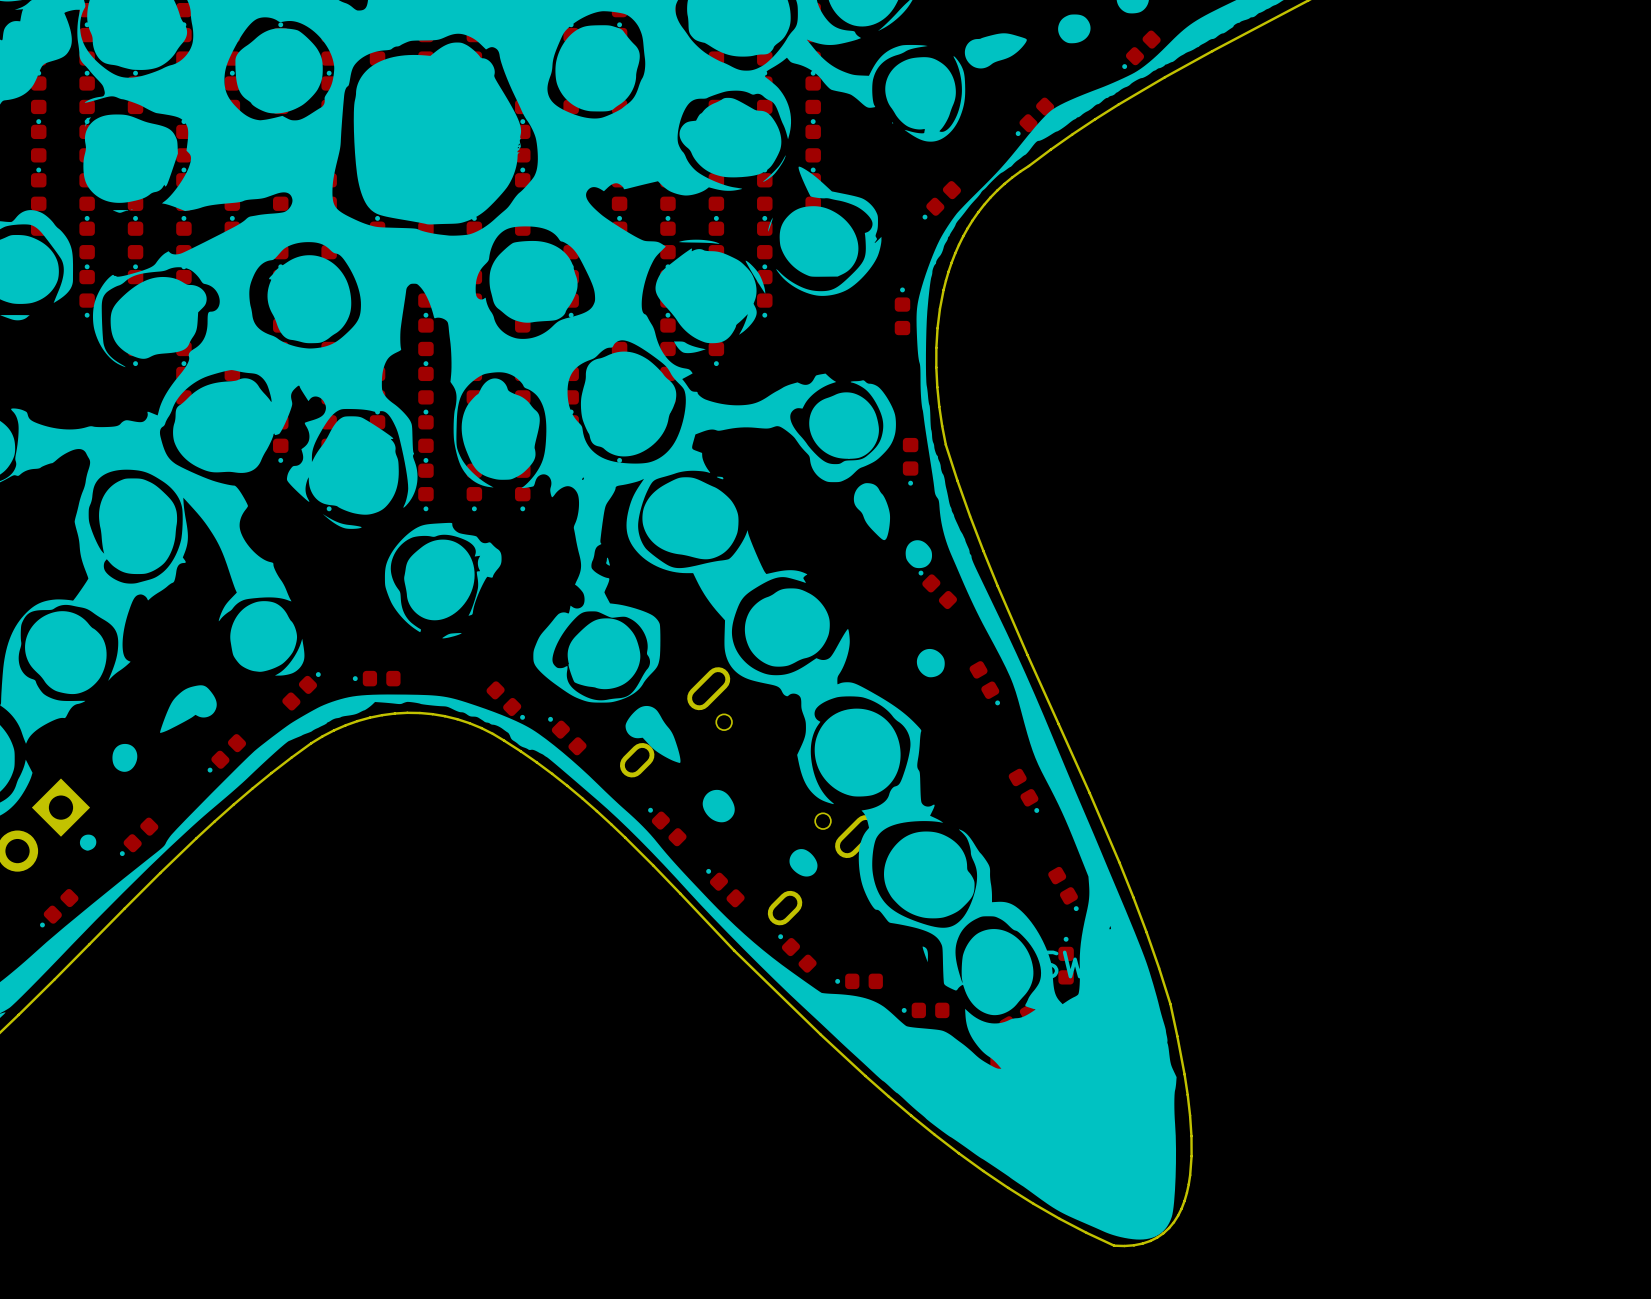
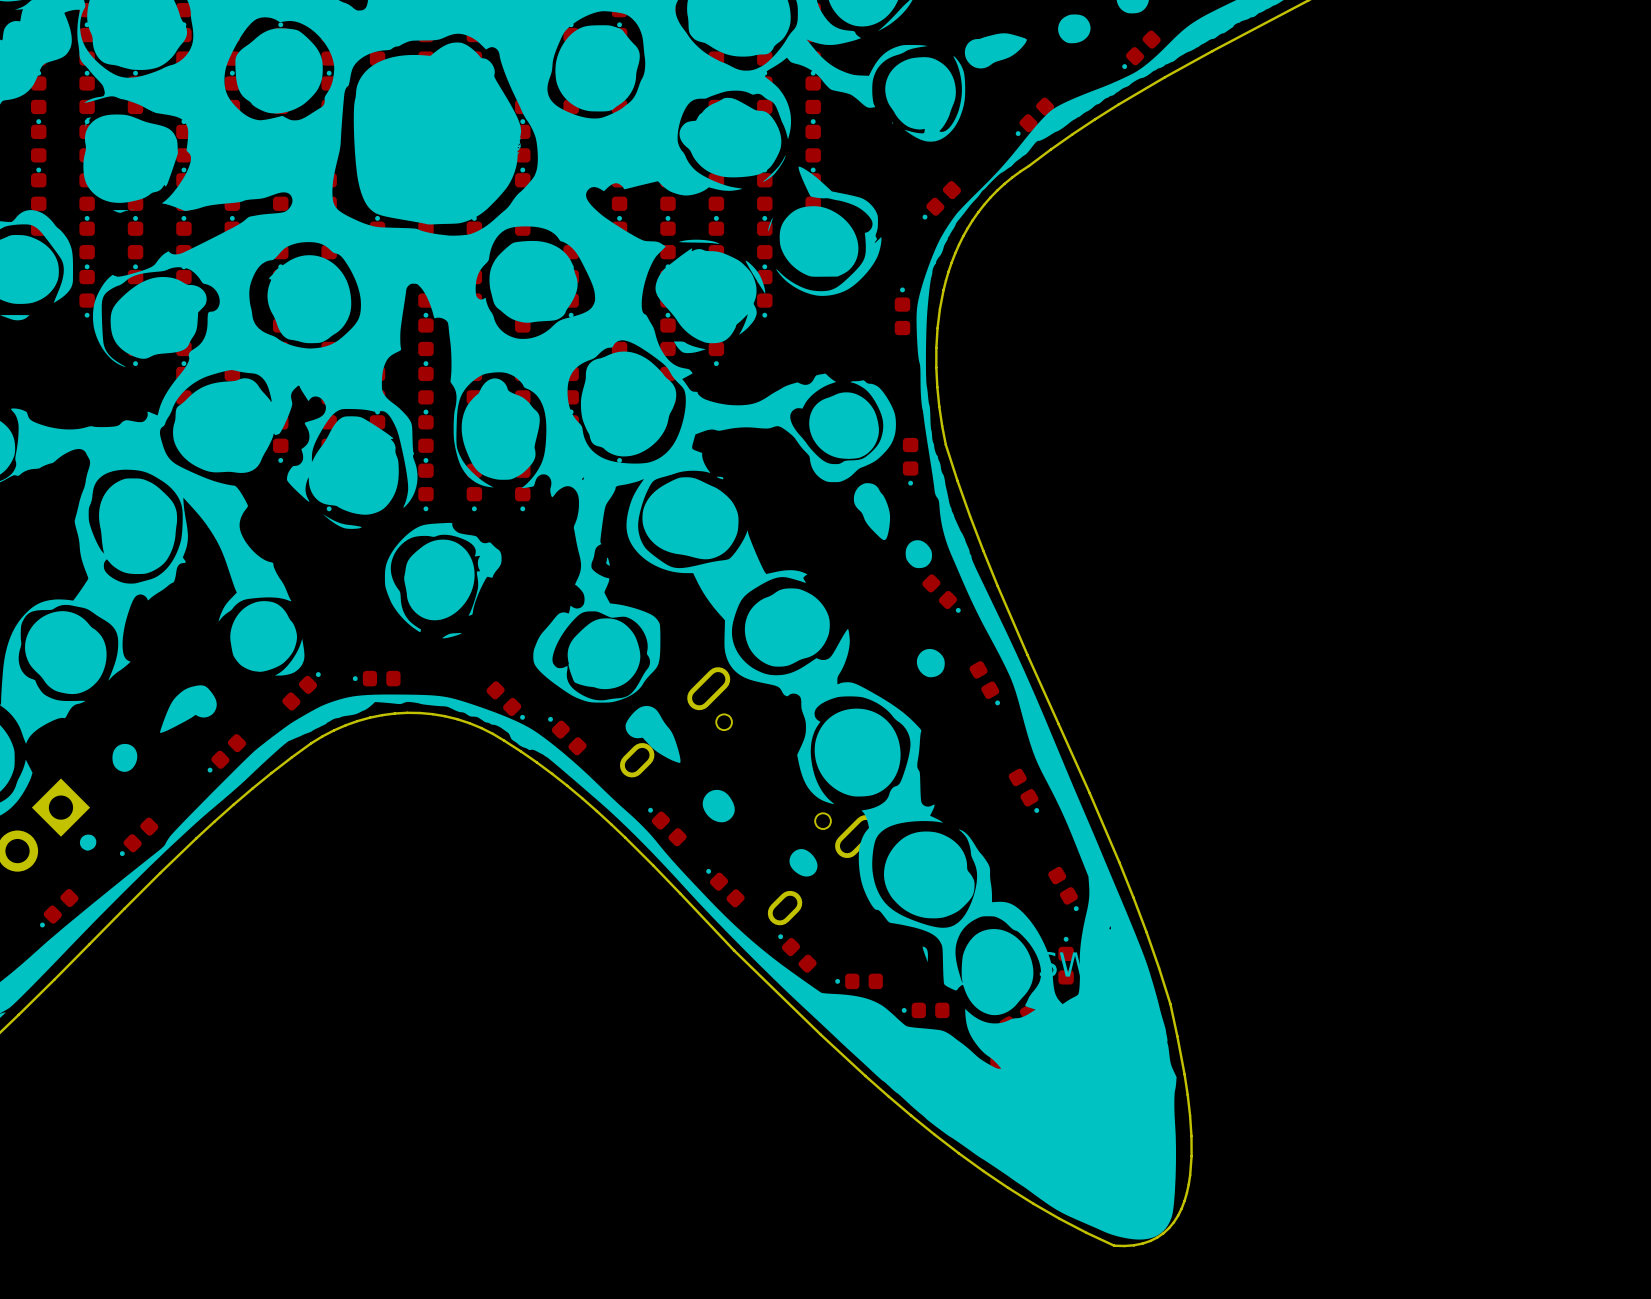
part rotation: 0° (937, 589) -> 180° (941, 593)

